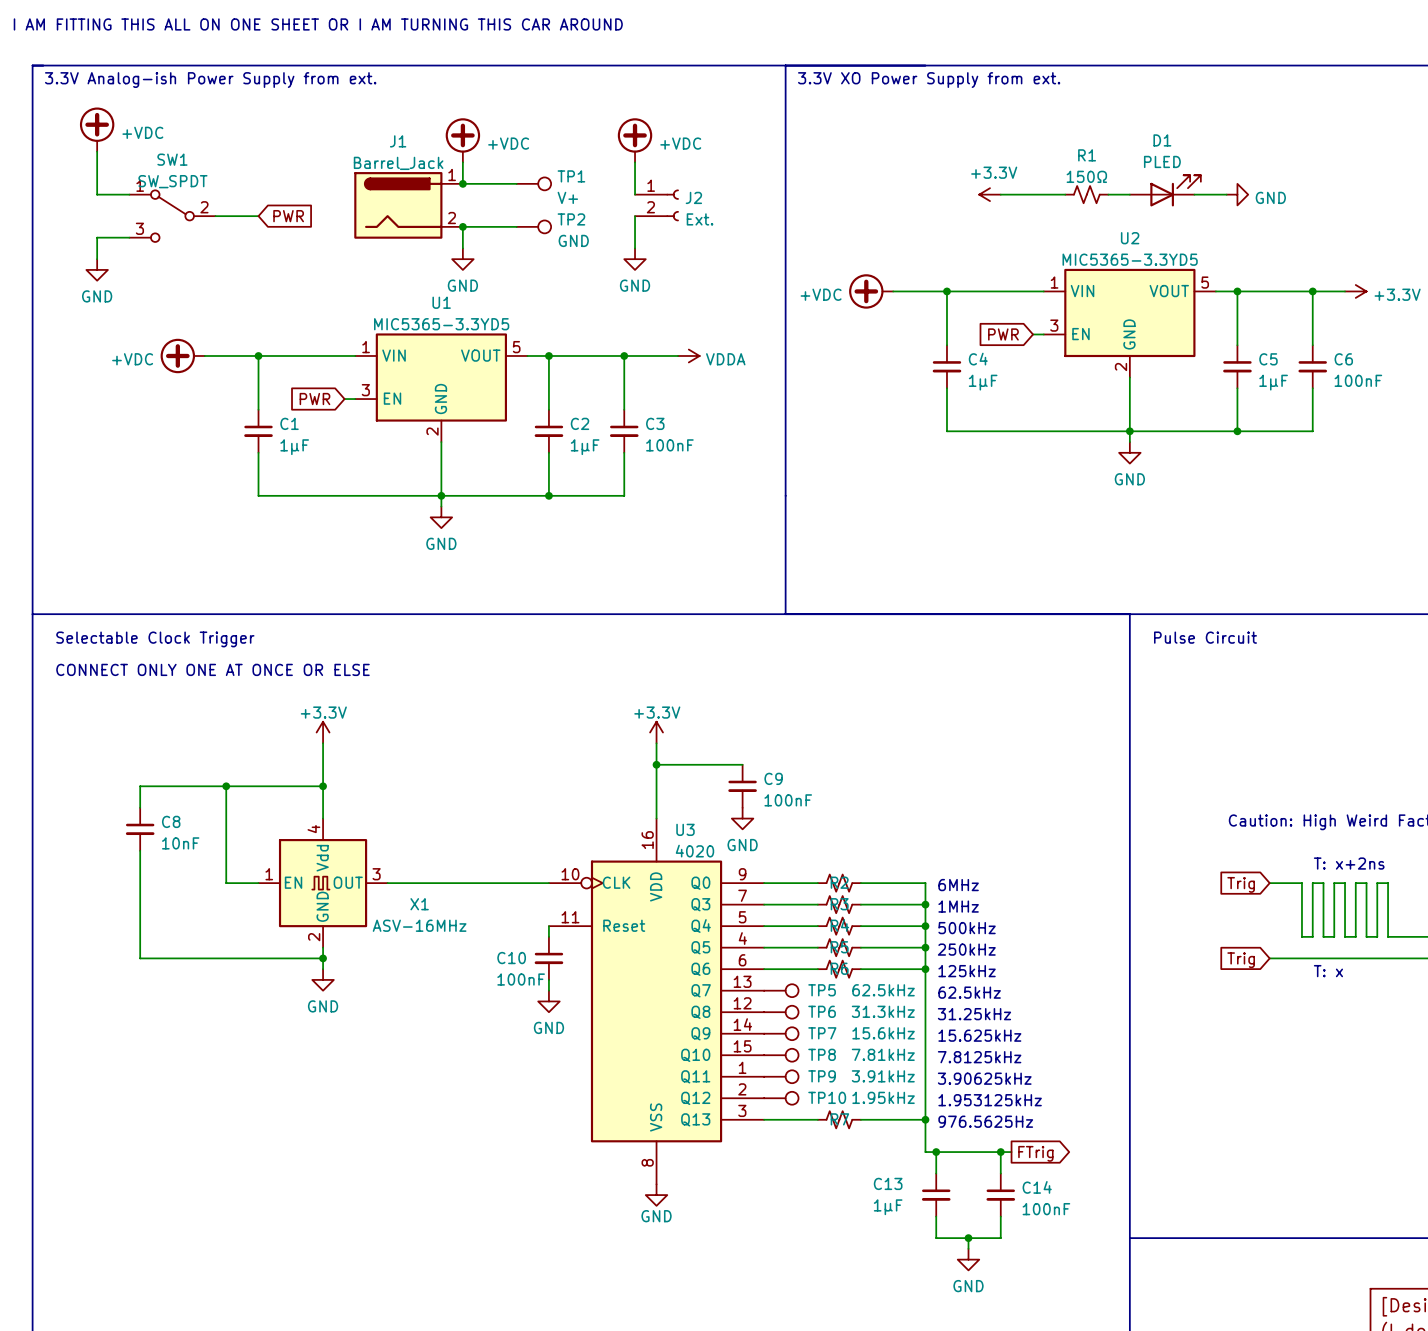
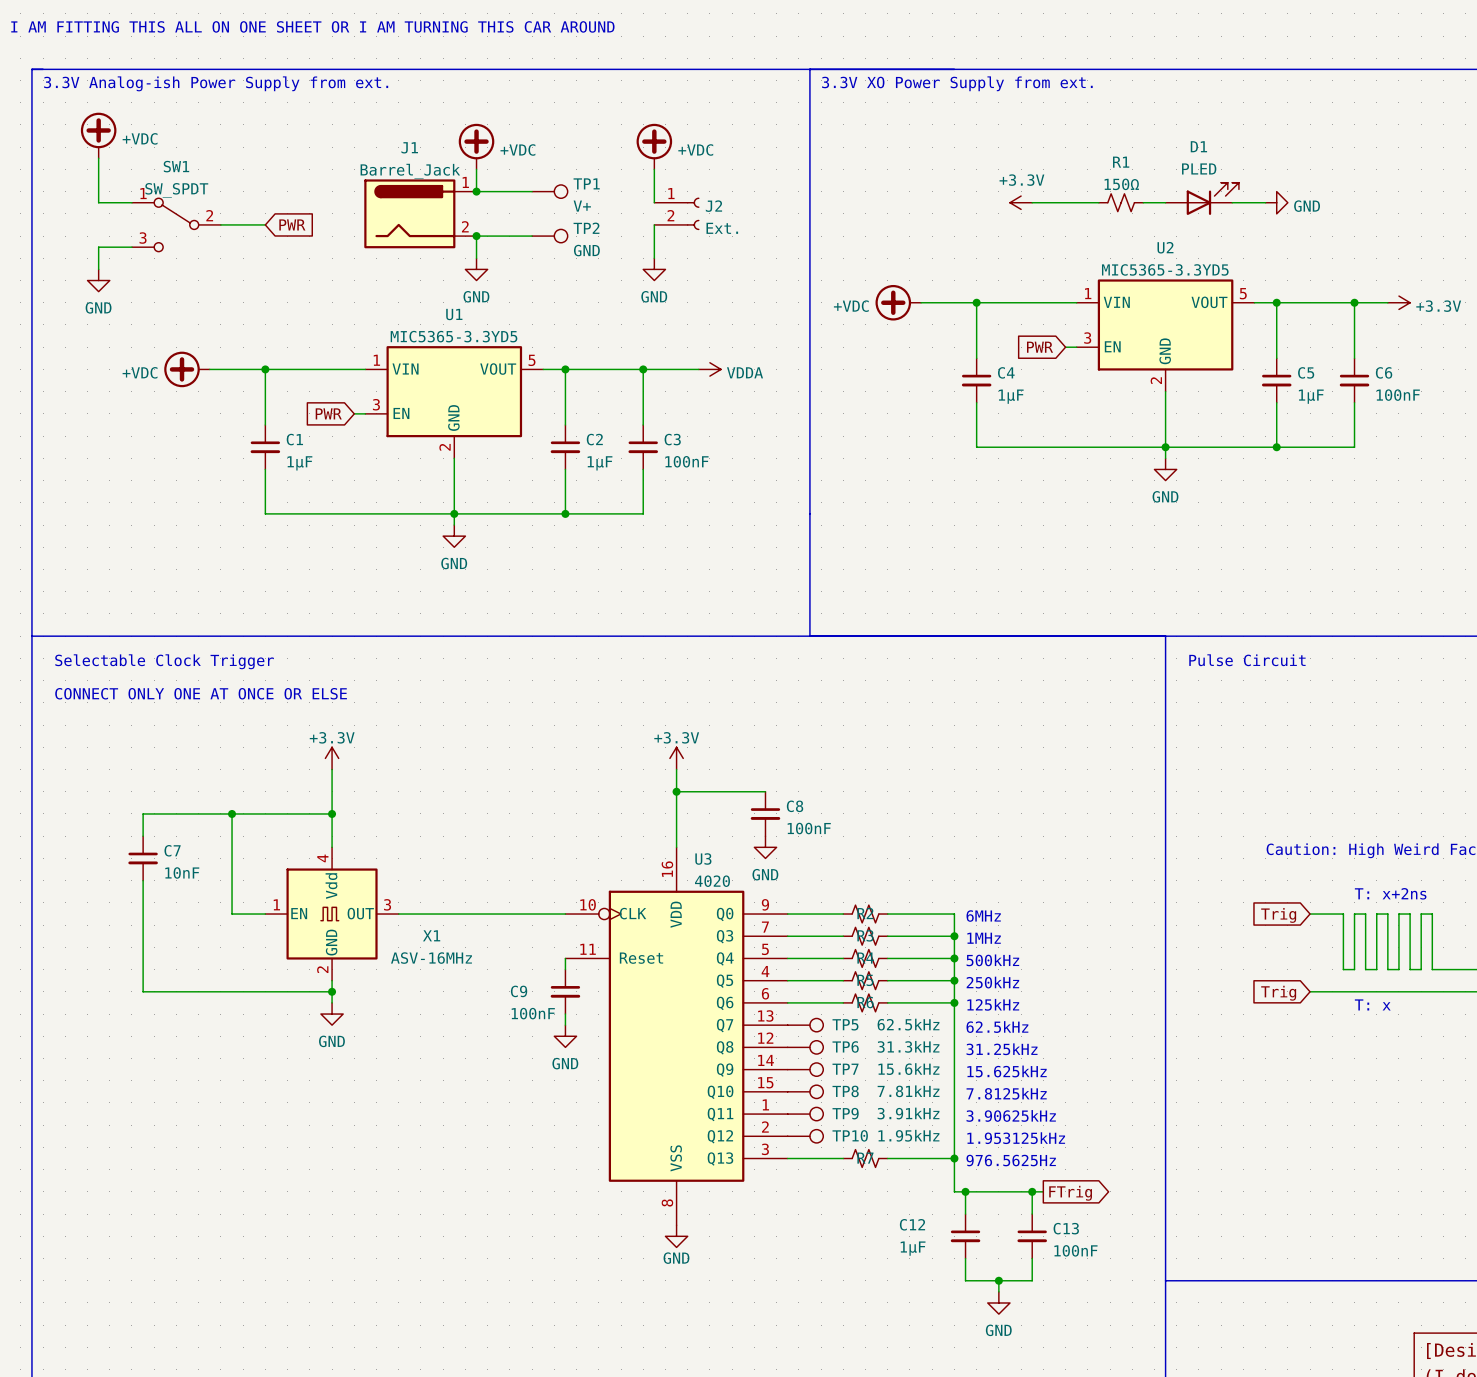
C9 name: C9 (773, 778) -> C8 (795, 806)
C8 name: C8 (171, 821) -> C7 (172, 850)
C10 name: C10 (511, 958) -> C9 (519, 991)
C13 name: C13 (888, 1183) -> C12 (912, 1224)
C14 name: C14 (1037, 1187) -> C13 (1066, 1228)

